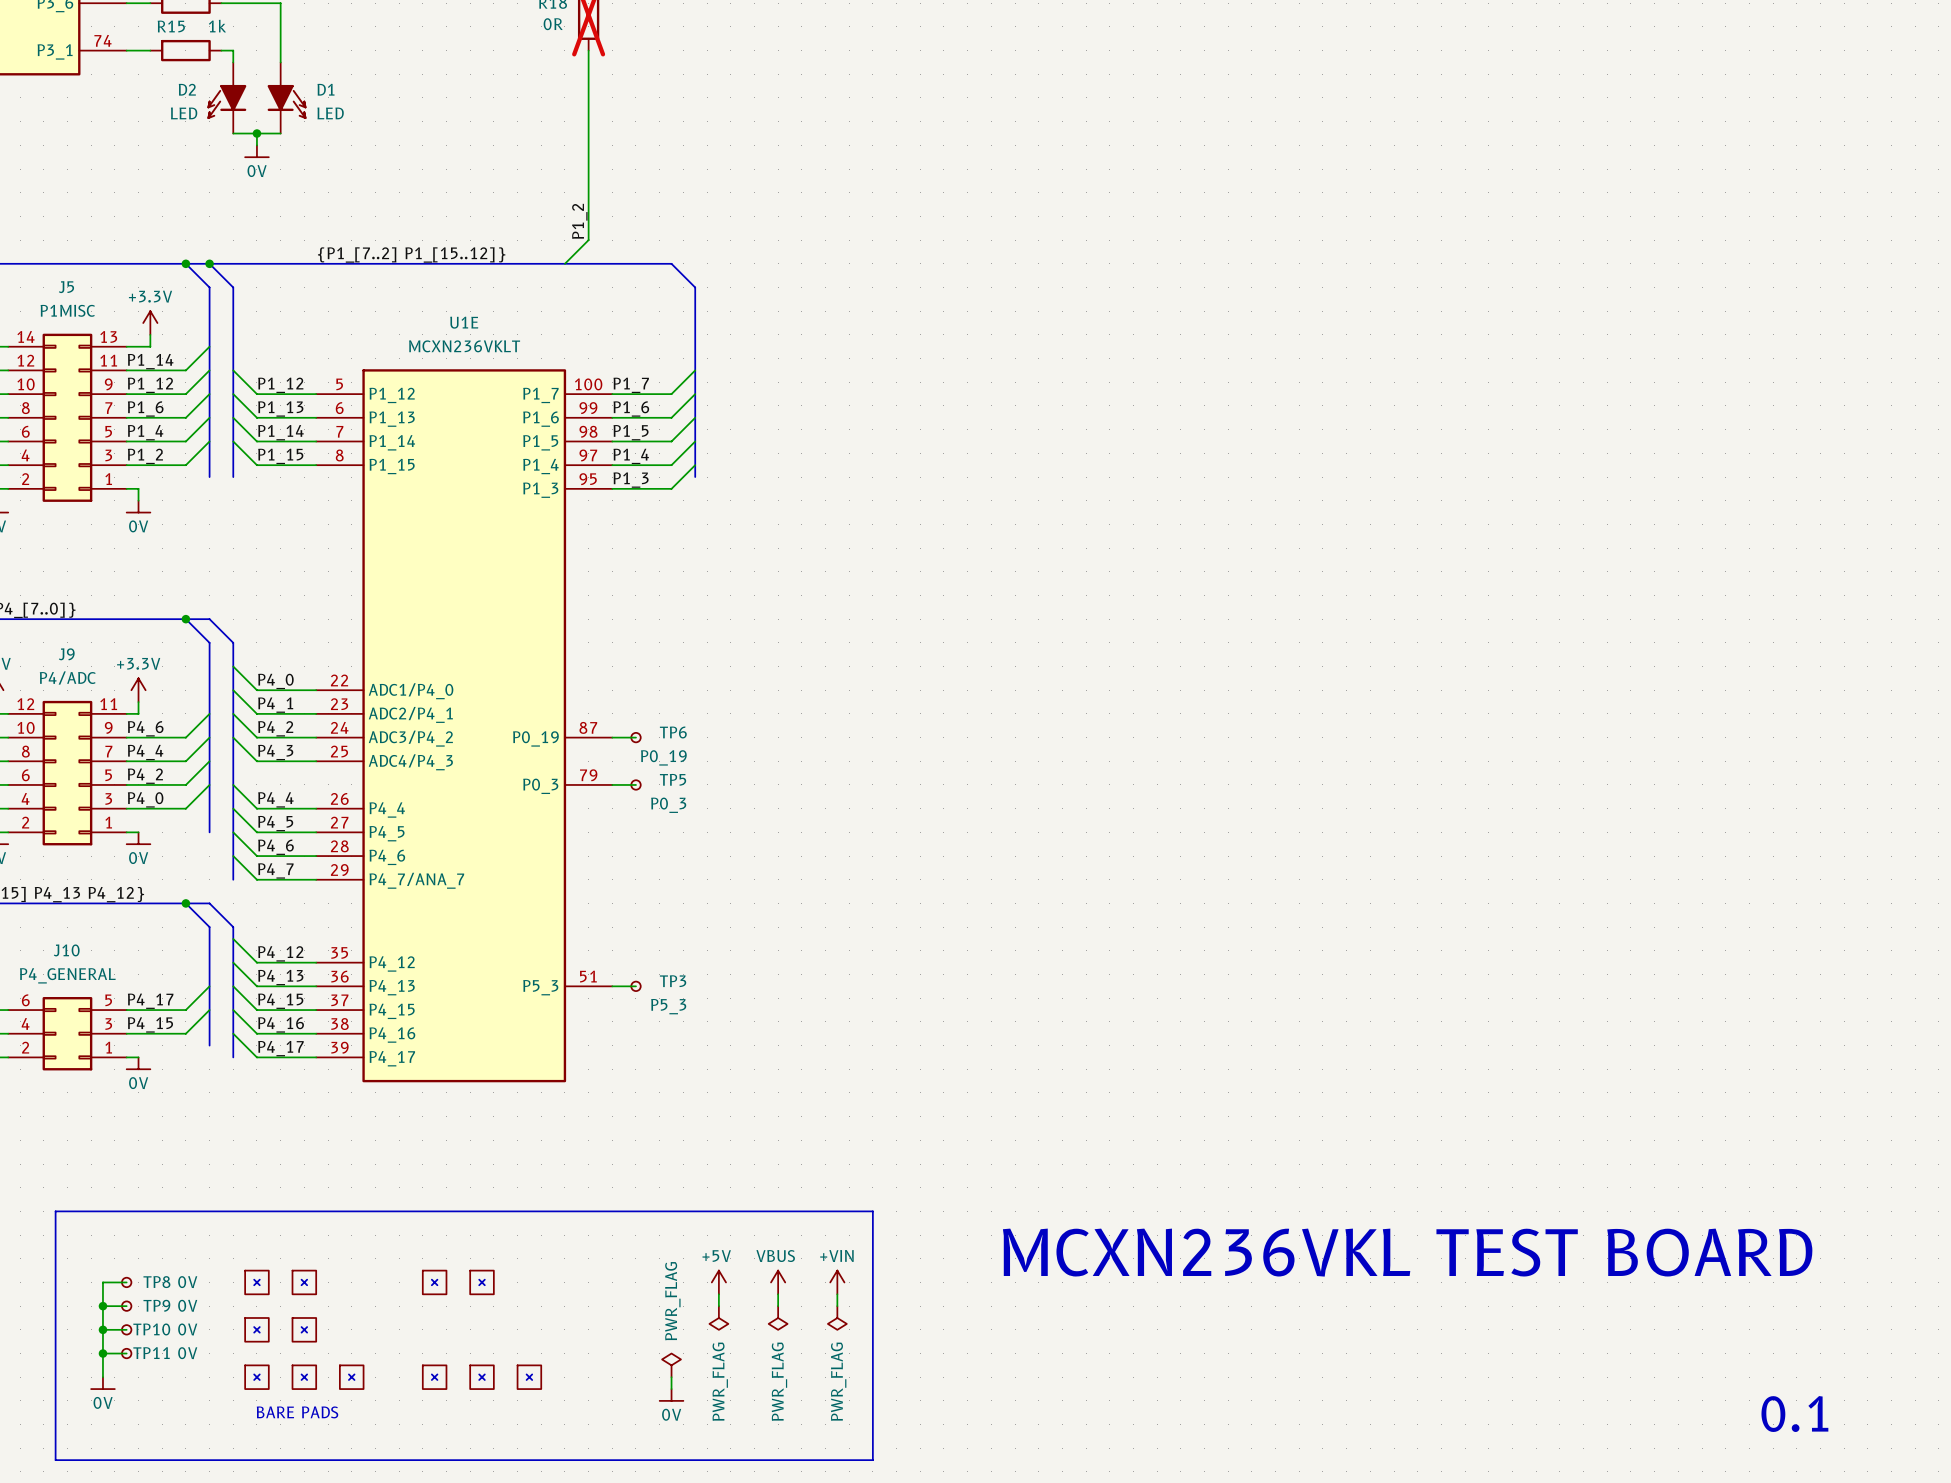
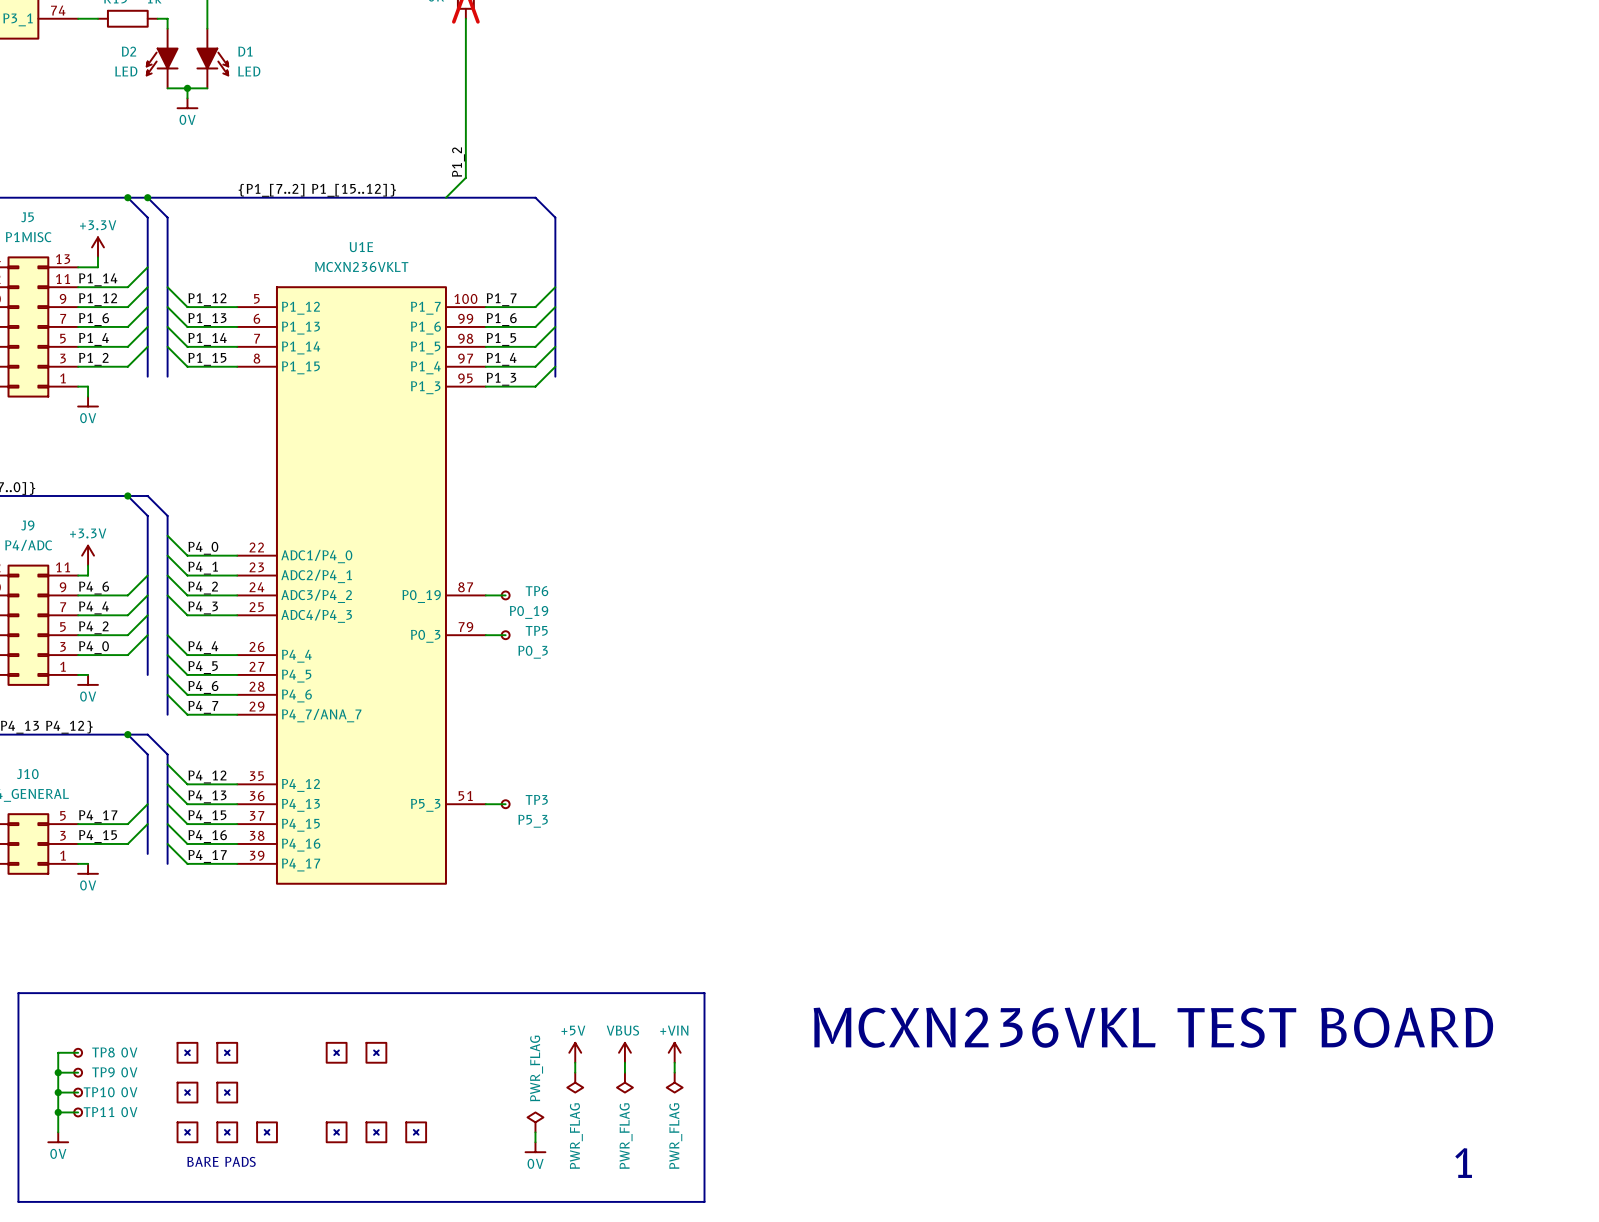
text: none -> 1 (1463, 1163)
text: 0.1 (1794, 1414) -> none

